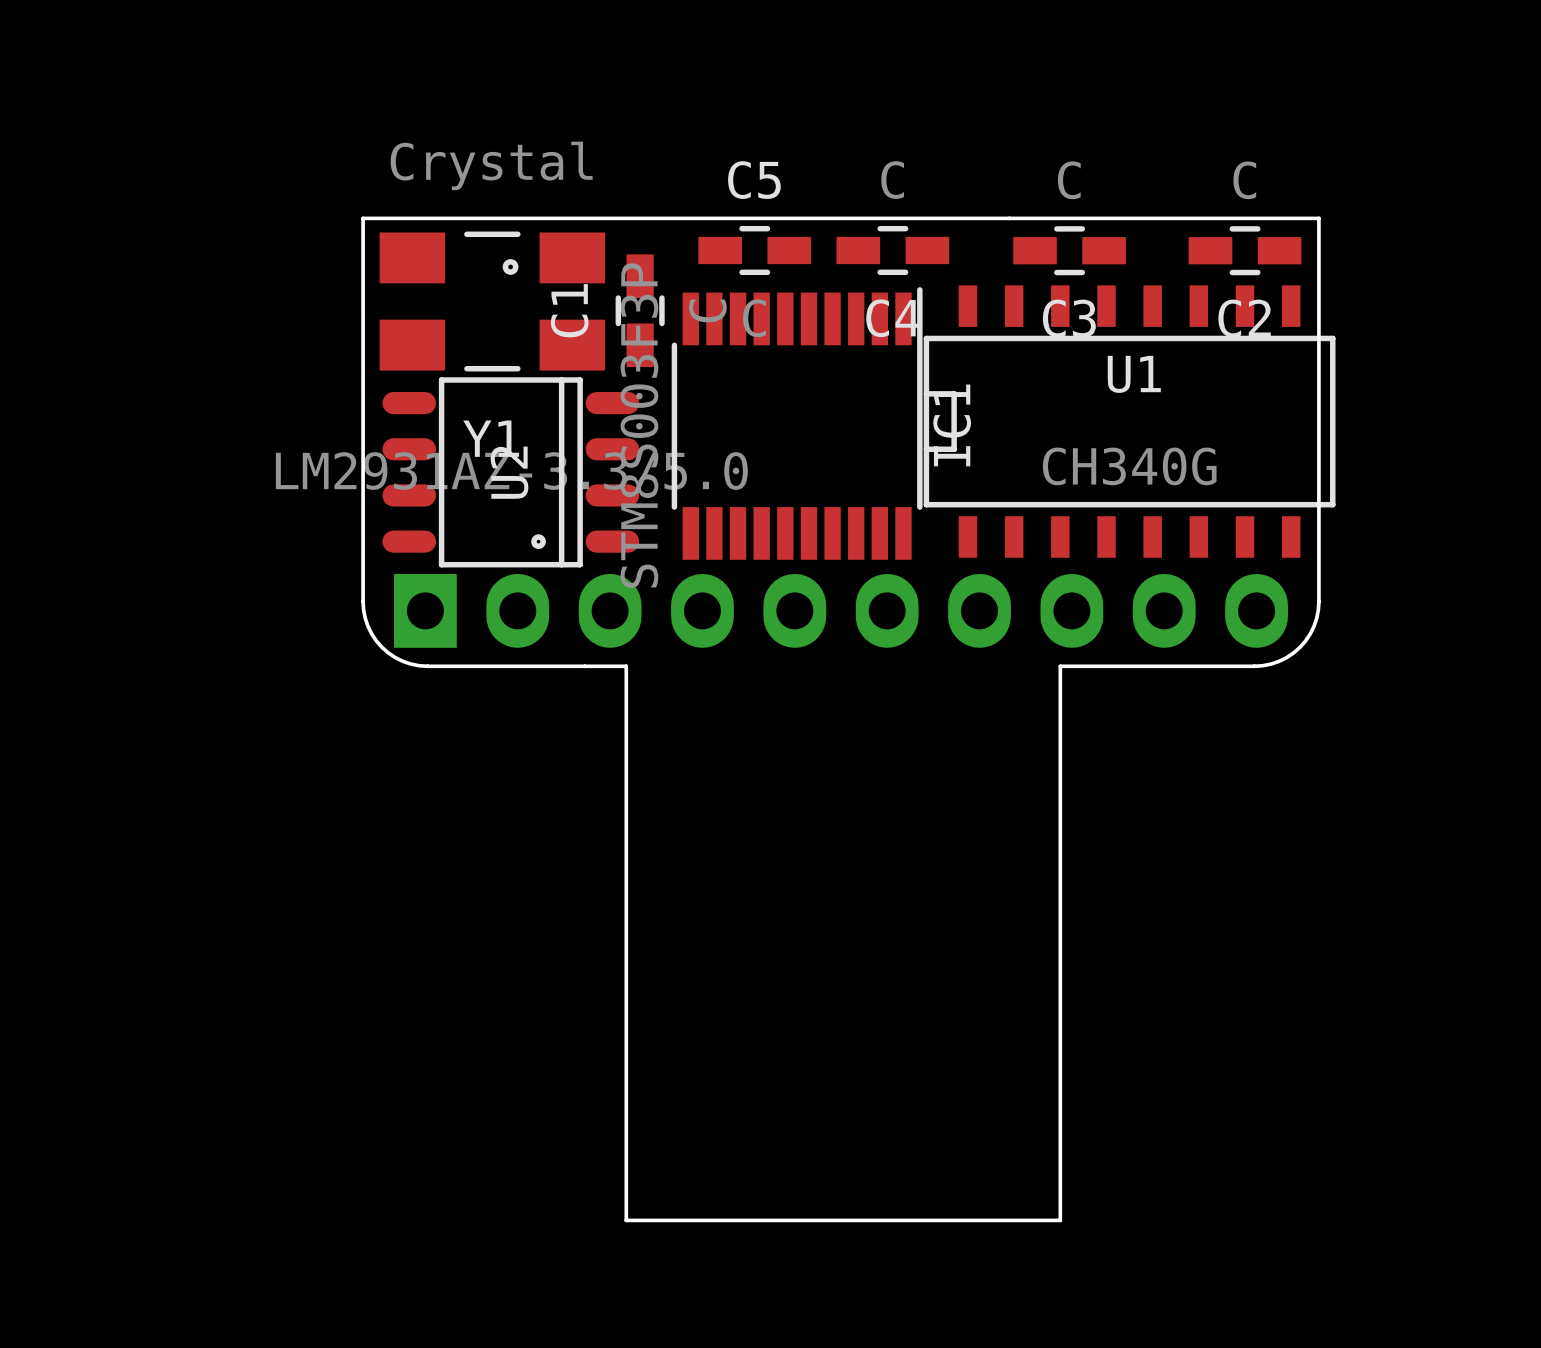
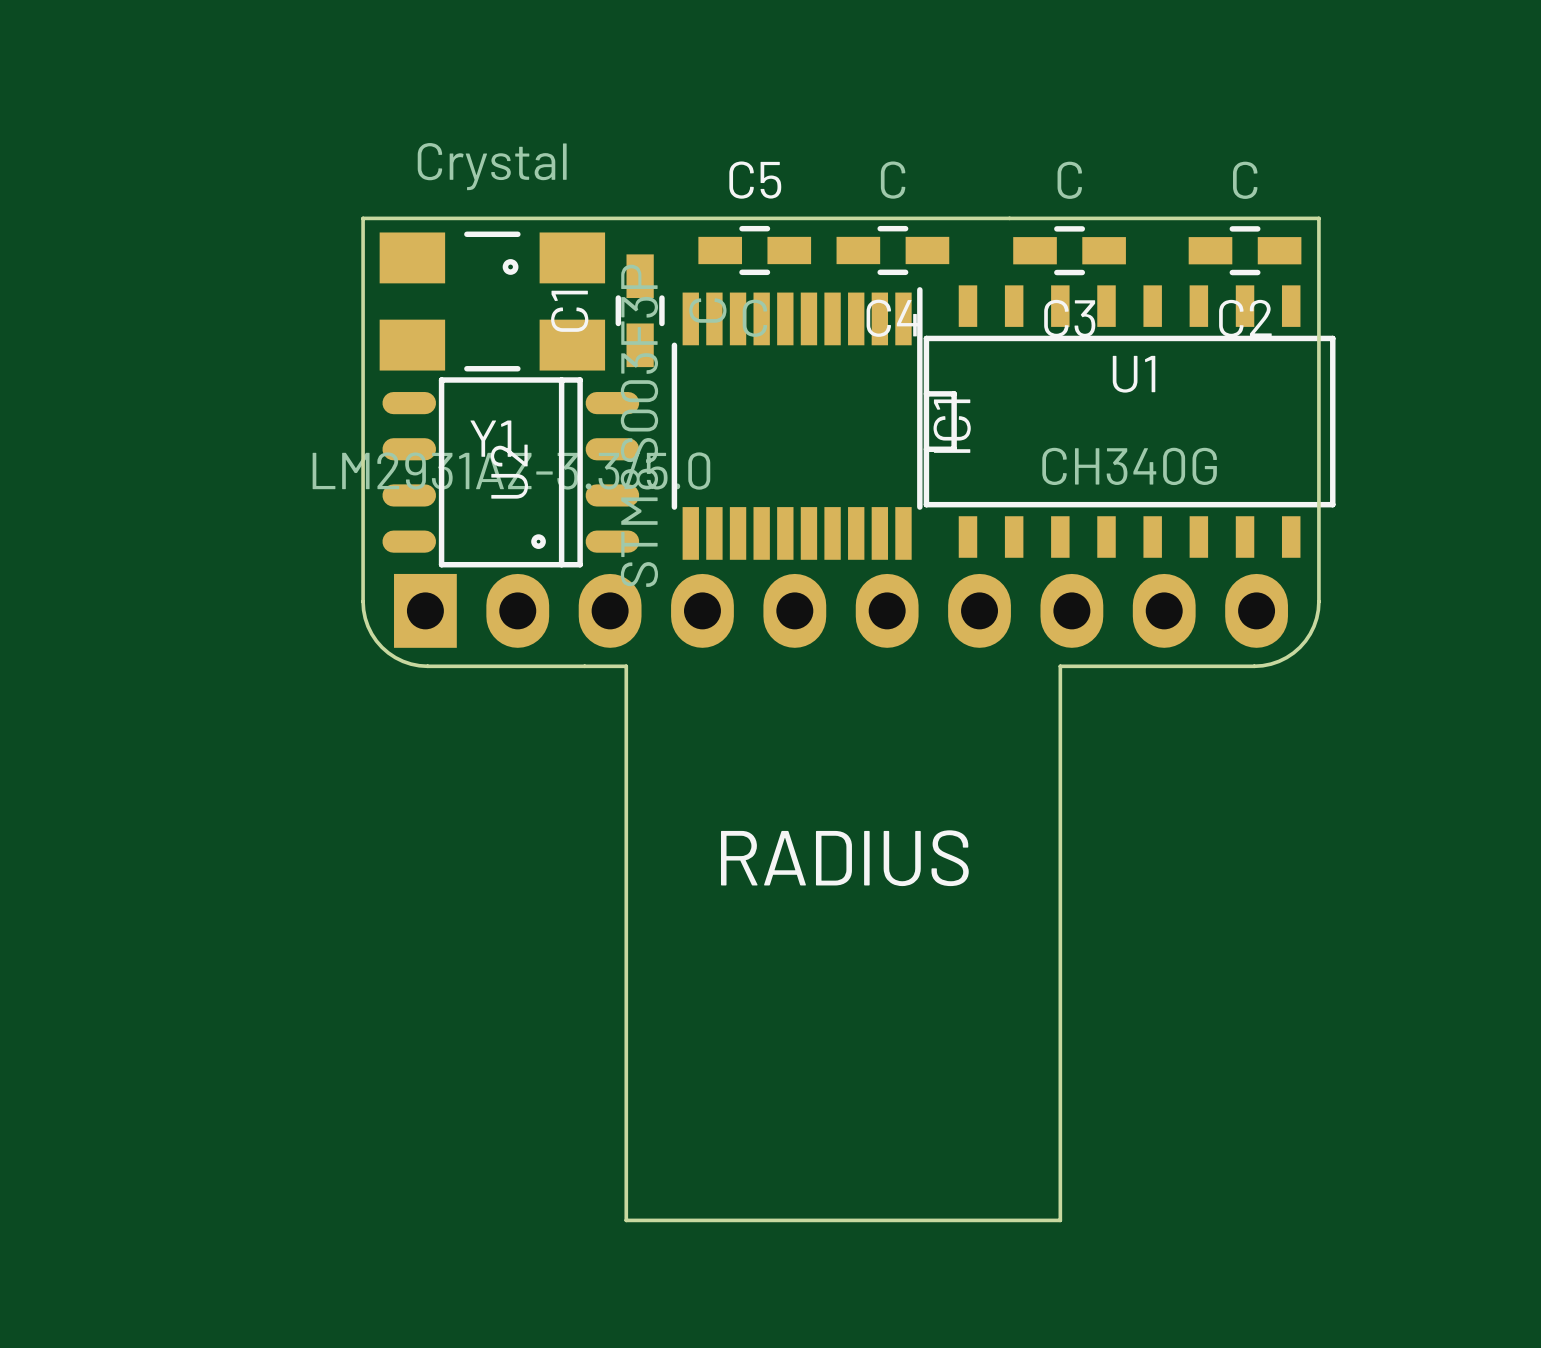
text: none -> RADIUS (844, 858)

